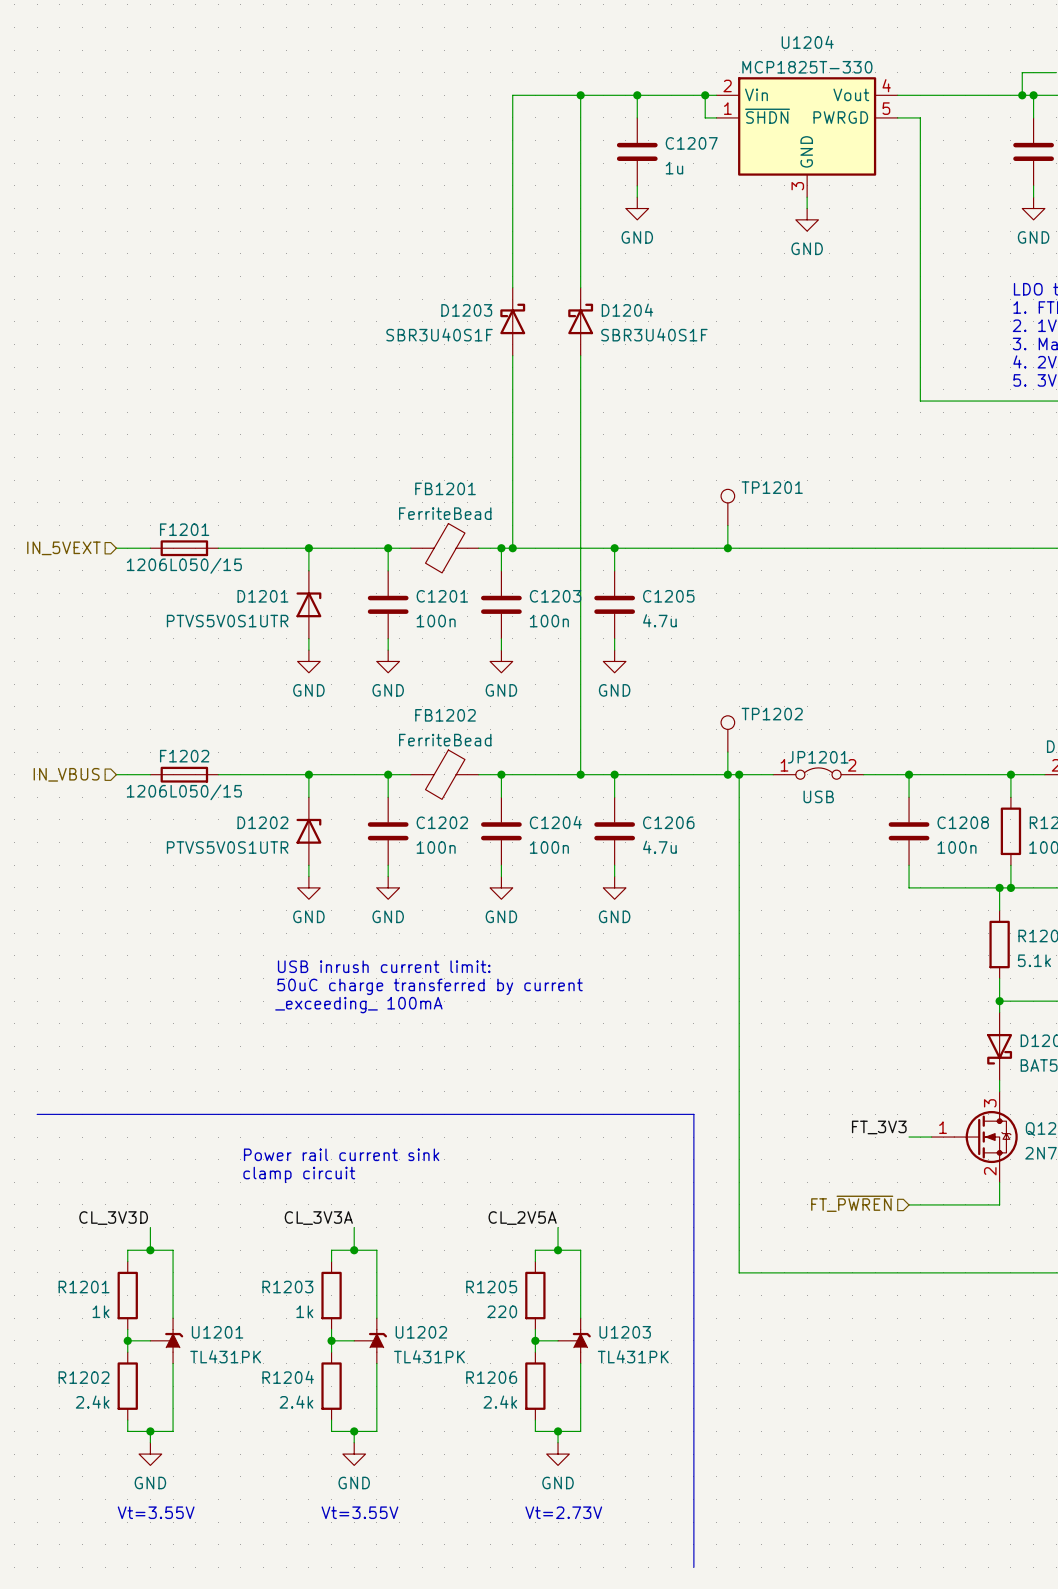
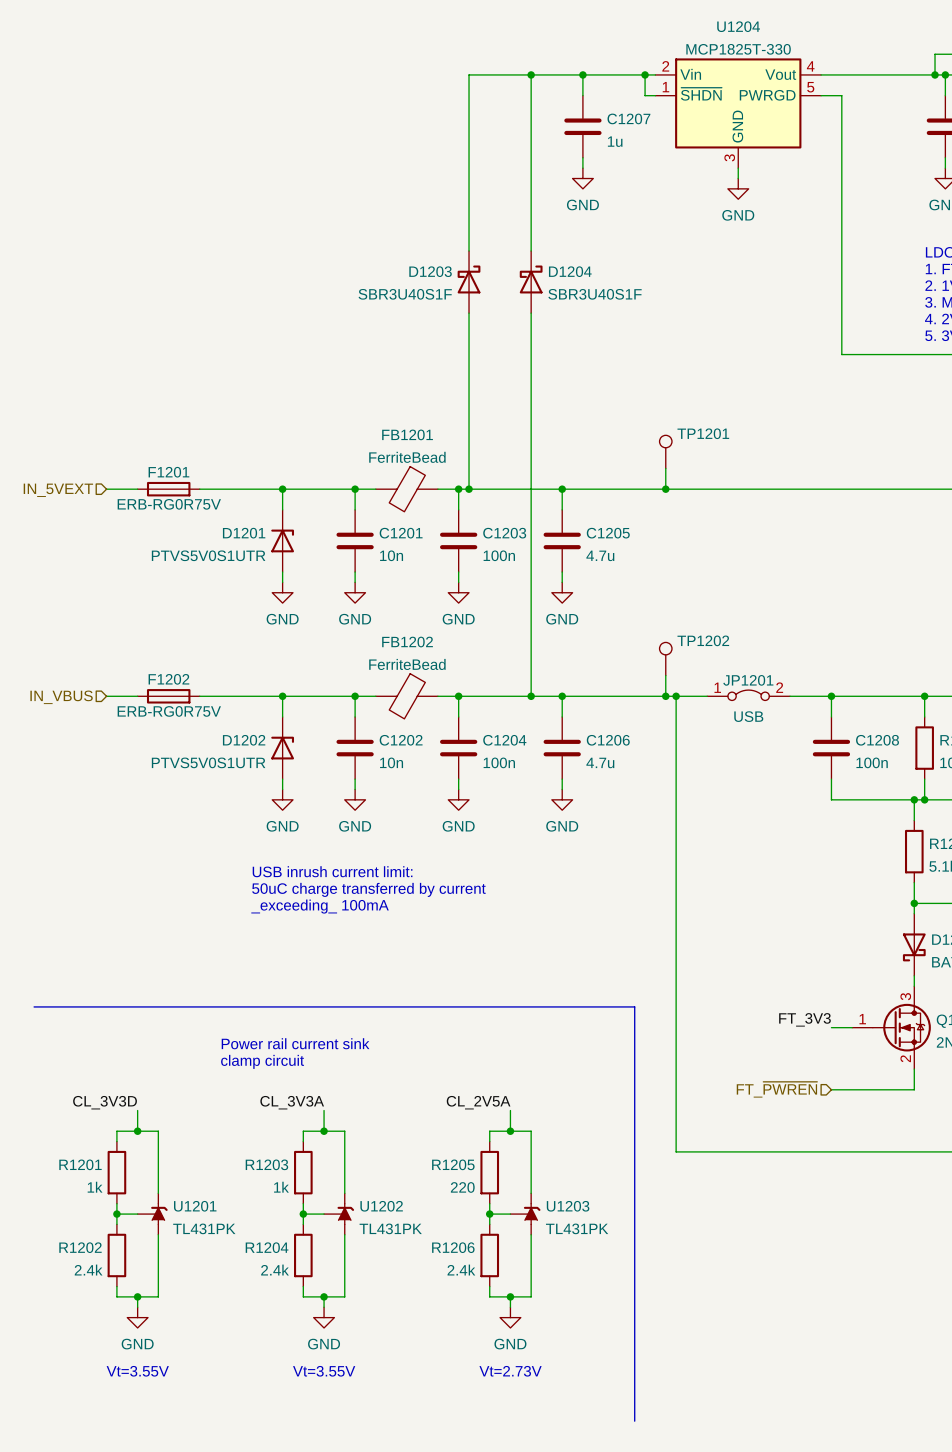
F1201 value: 1206L050/15 (184, 565) -> ERB-RG0R75V (169, 504)
C1201 value: 100n (436, 621) -> 10n (391, 555)
F1202 value: 1206L050/15 (184, 792) -> ERB-RG0R75V (169, 711)
C1202 value: 100n (436, 847) -> 10n (391, 762)

